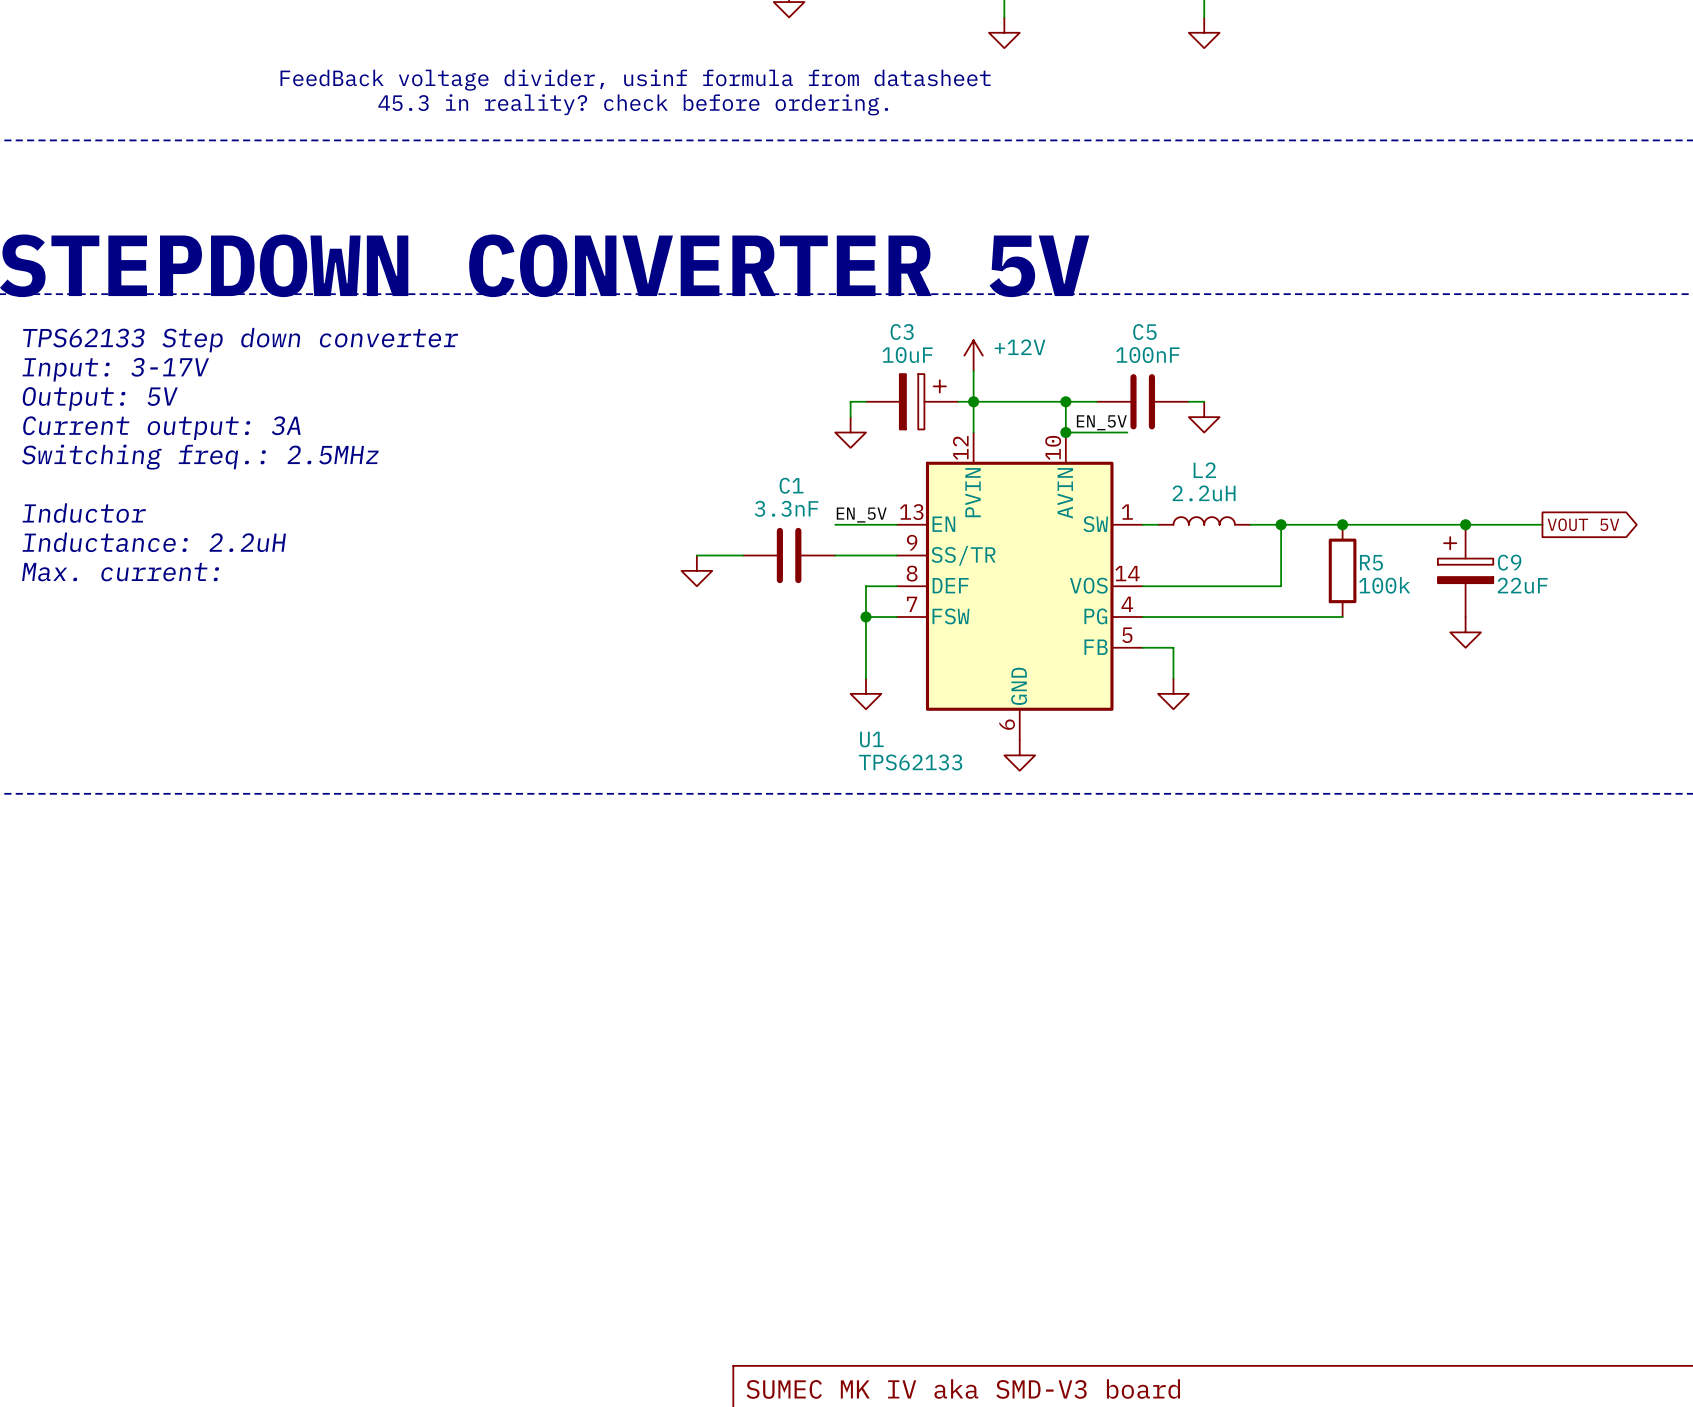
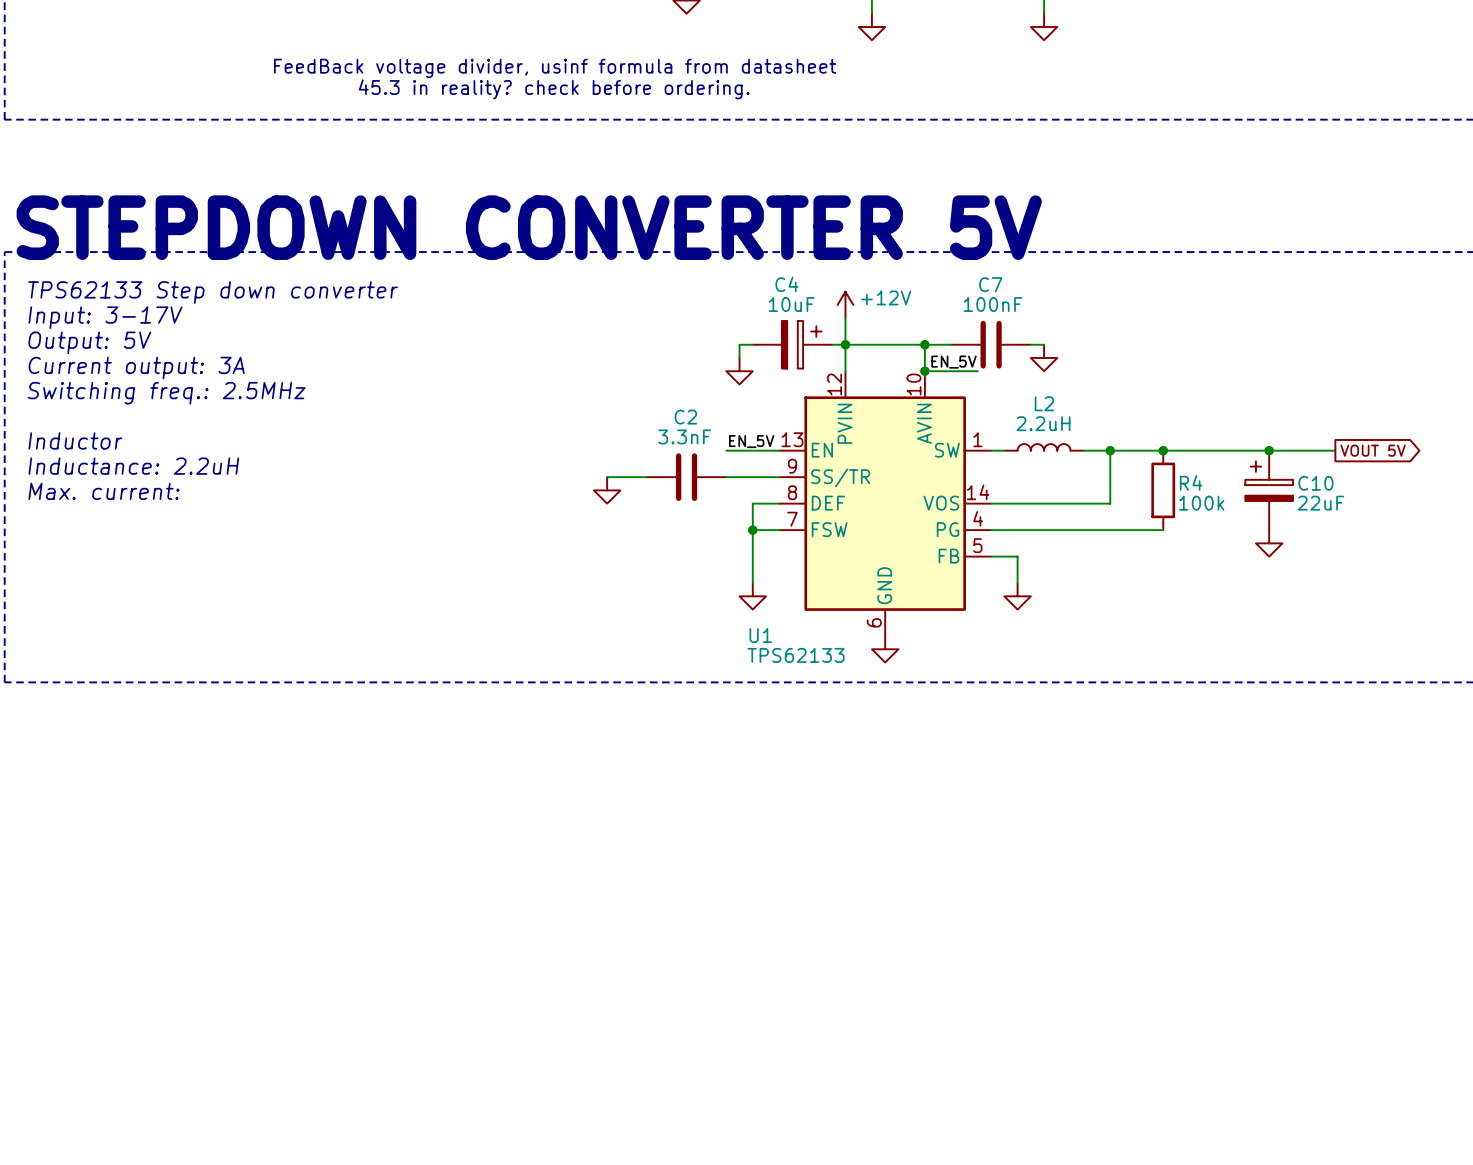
C3 name: C3 (902, 332) -> C4 (786, 284)
C5 name: C5 (1144, 332) -> C7 (990, 284)
C1 name: C1 (791, 485) -> C2 (685, 417)
R5 name: R5 (1371, 562) -> R4 (1191, 482)
C9 name: C9 (1509, 562) -> C10 (1315, 483)

